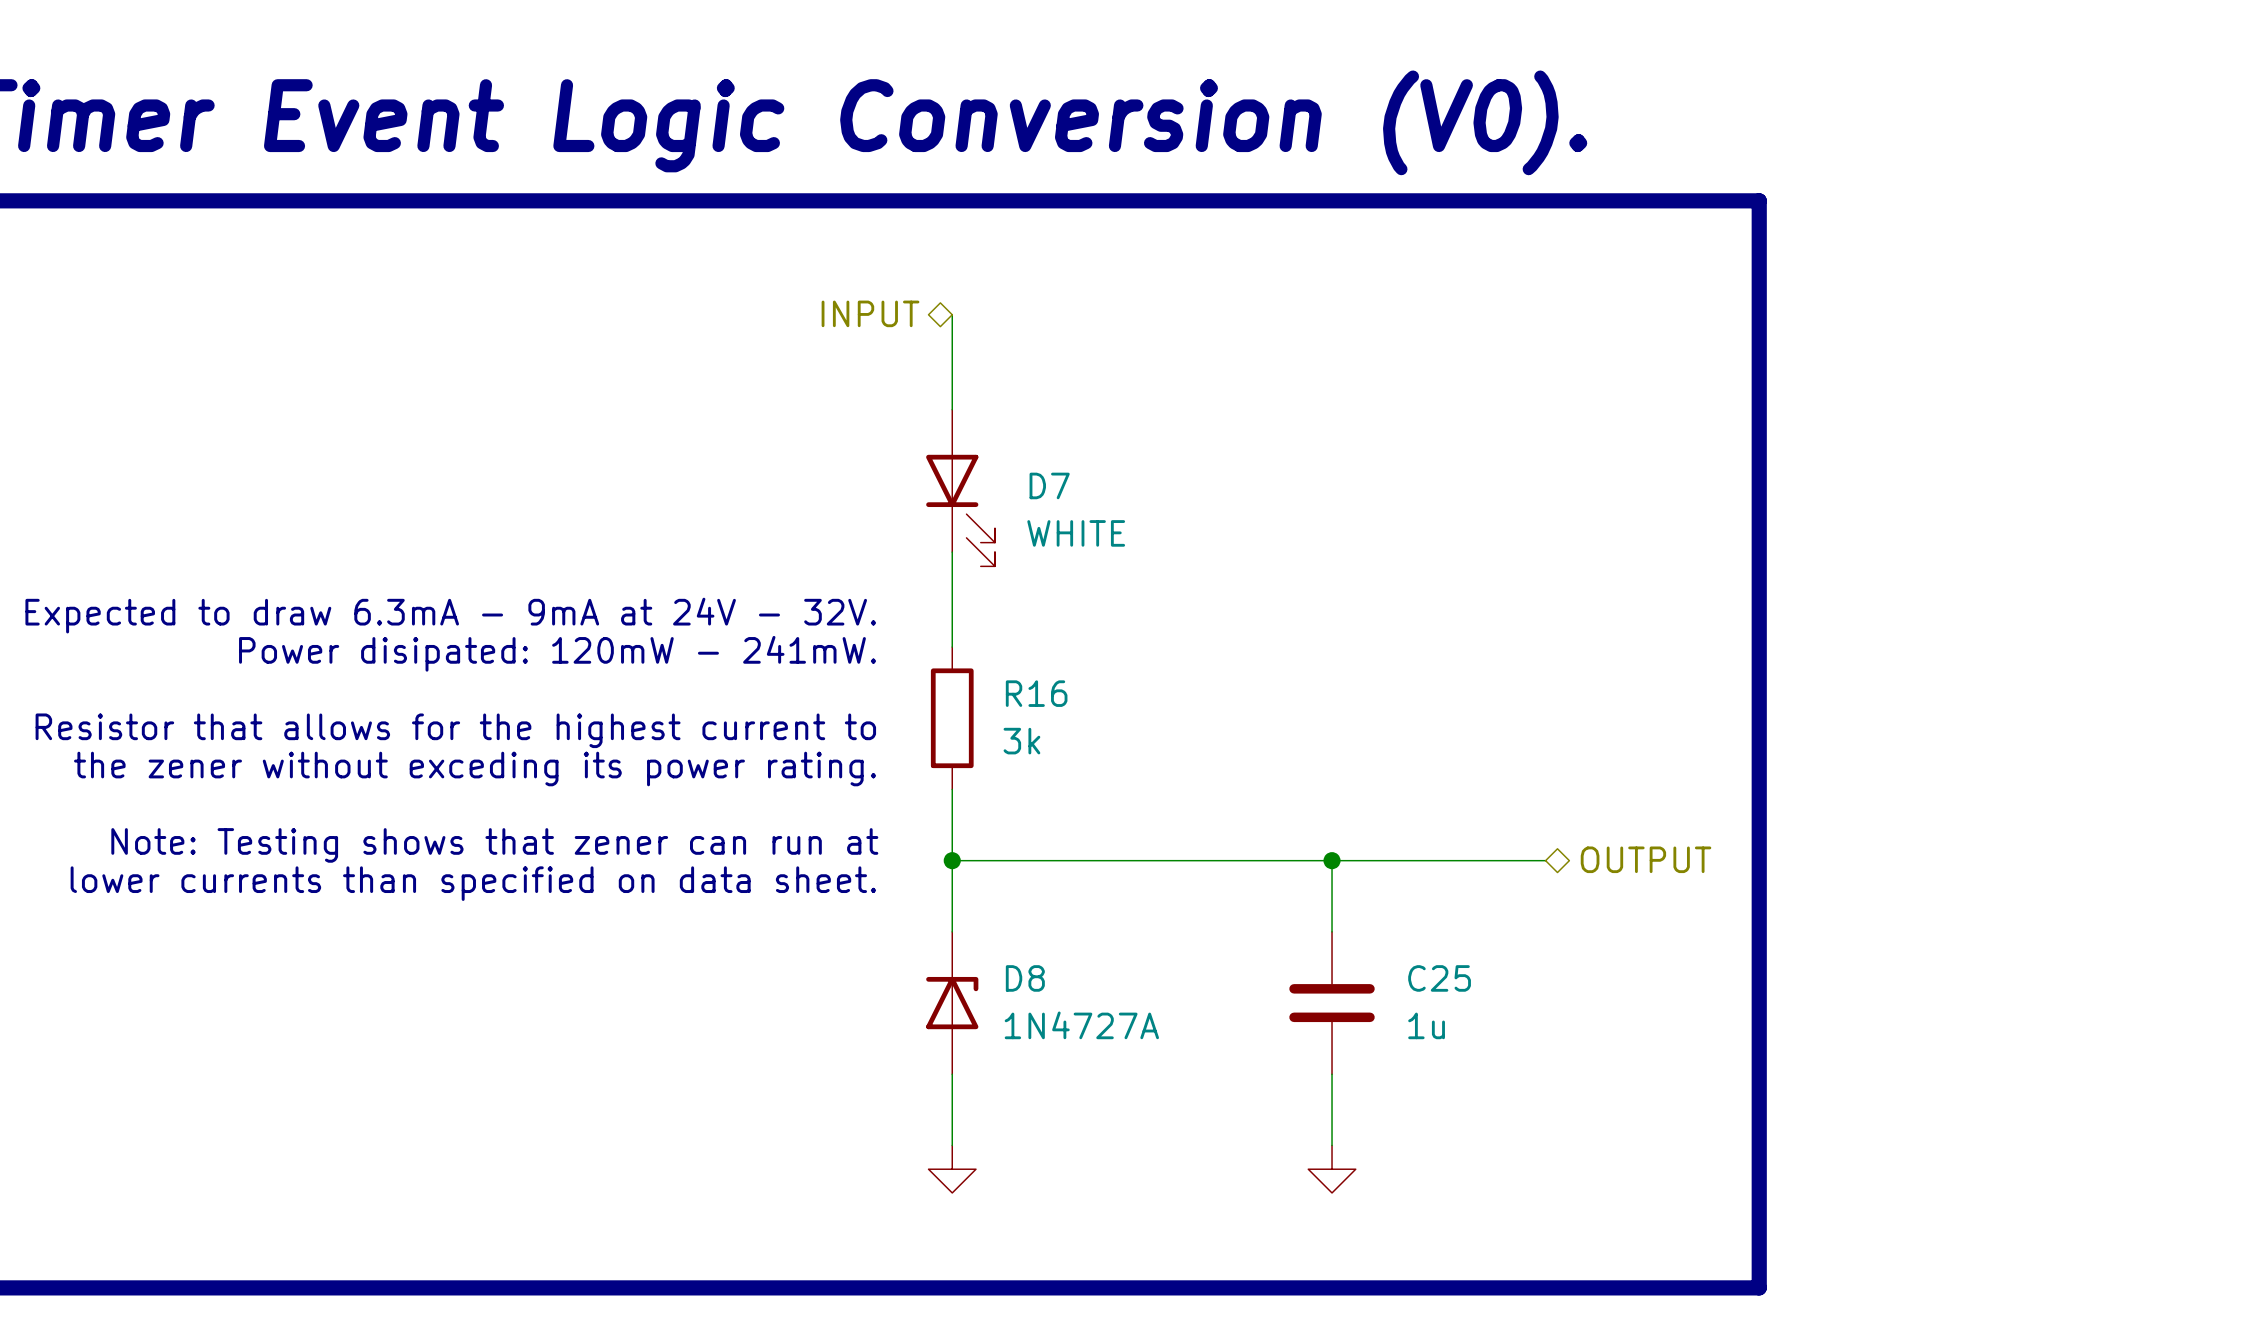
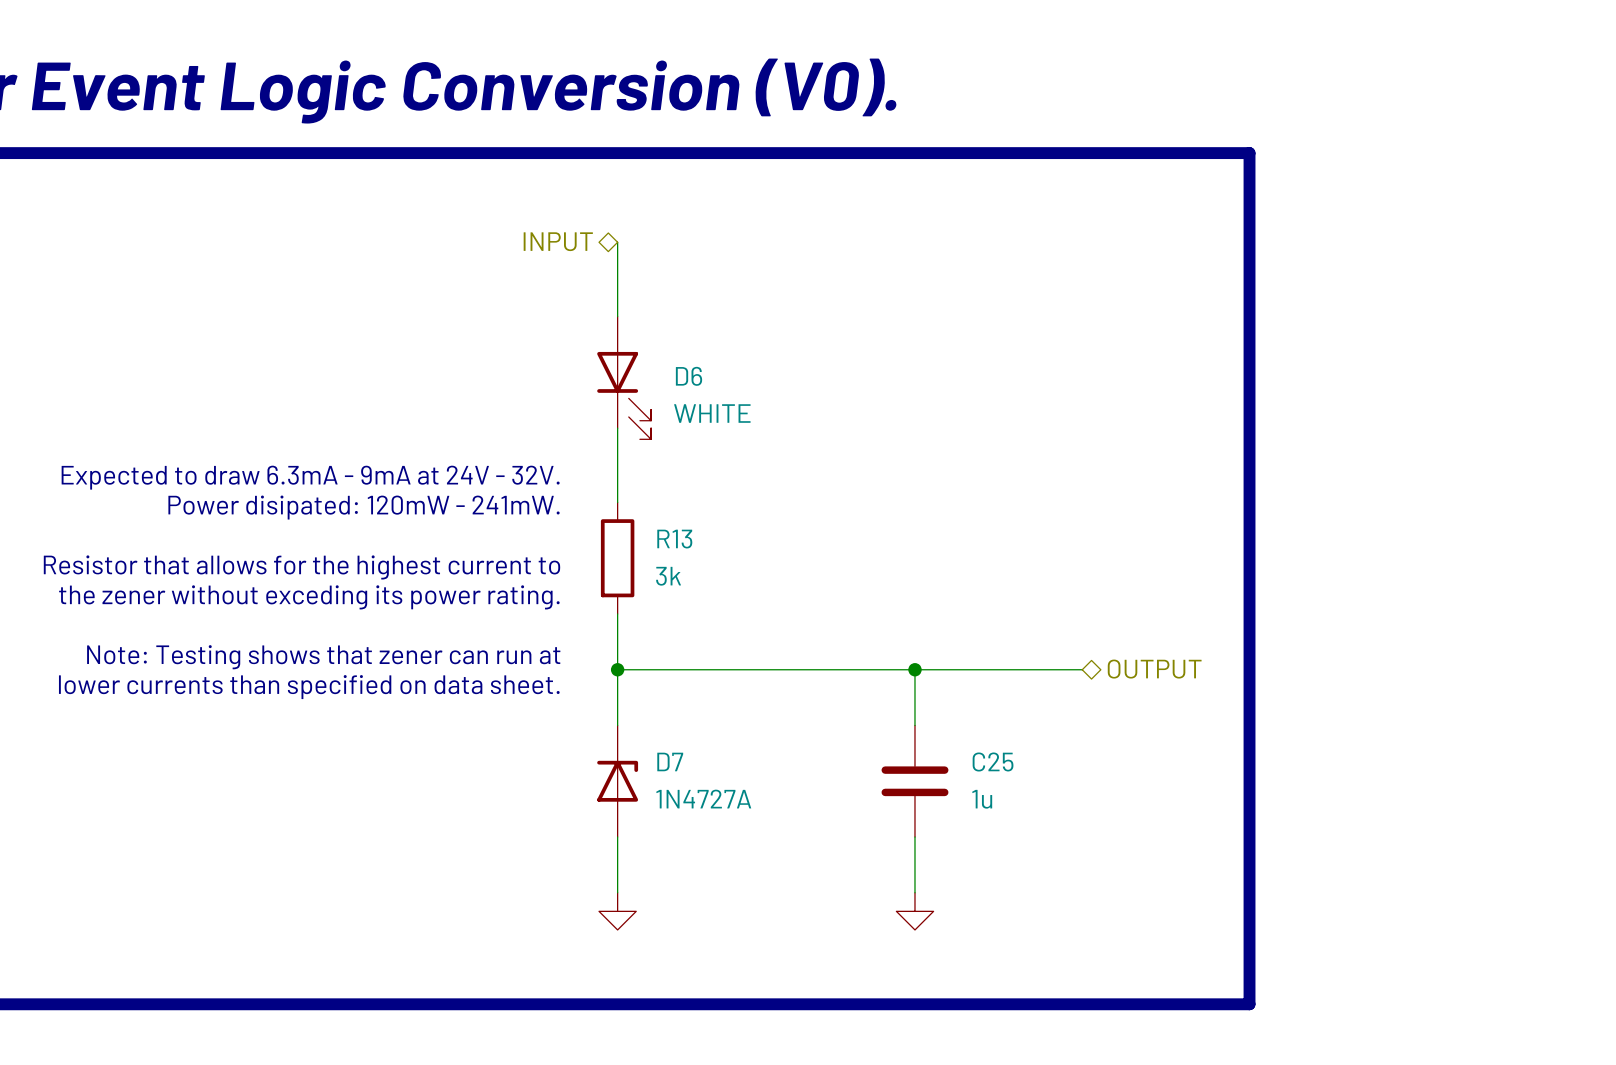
D7 name: D7 (1049, 485) -> D6 (689, 376)
R16 name: R16 (1036, 693) -> R13 (674, 539)
D8 name: D8 (1025, 978) -> D7 (670, 761)

